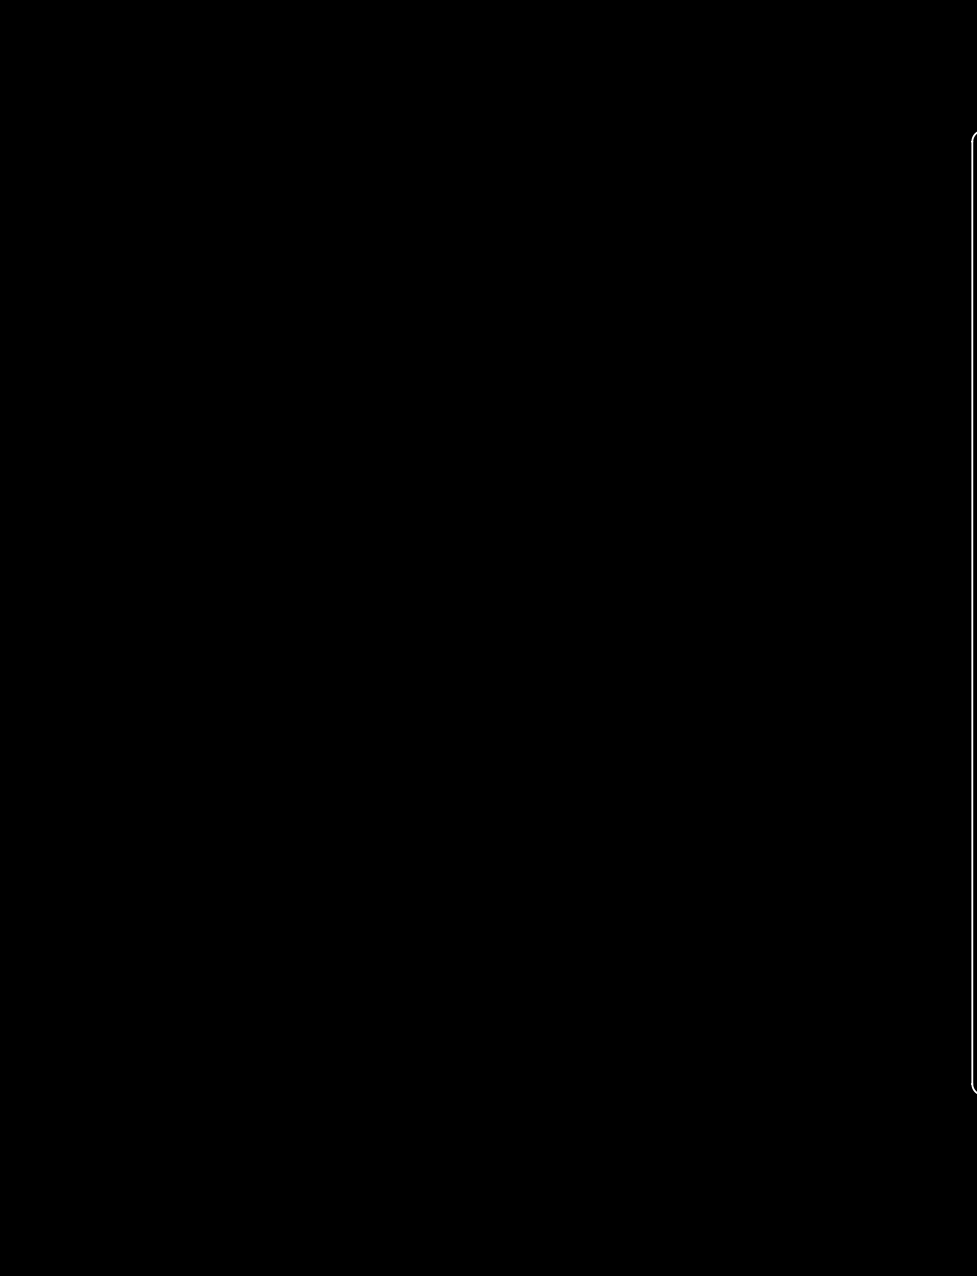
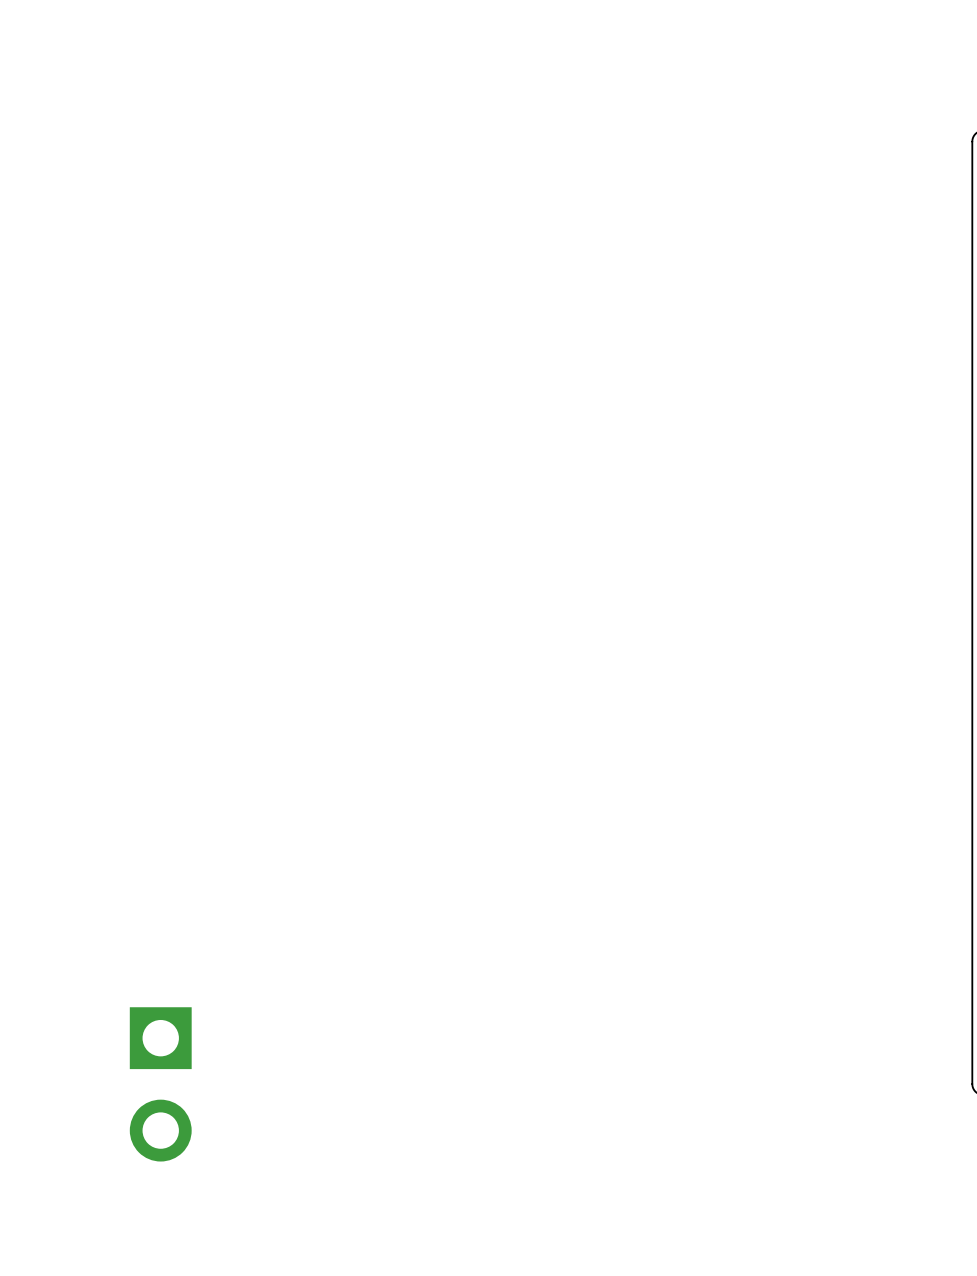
part: none -> (160, 1084)

